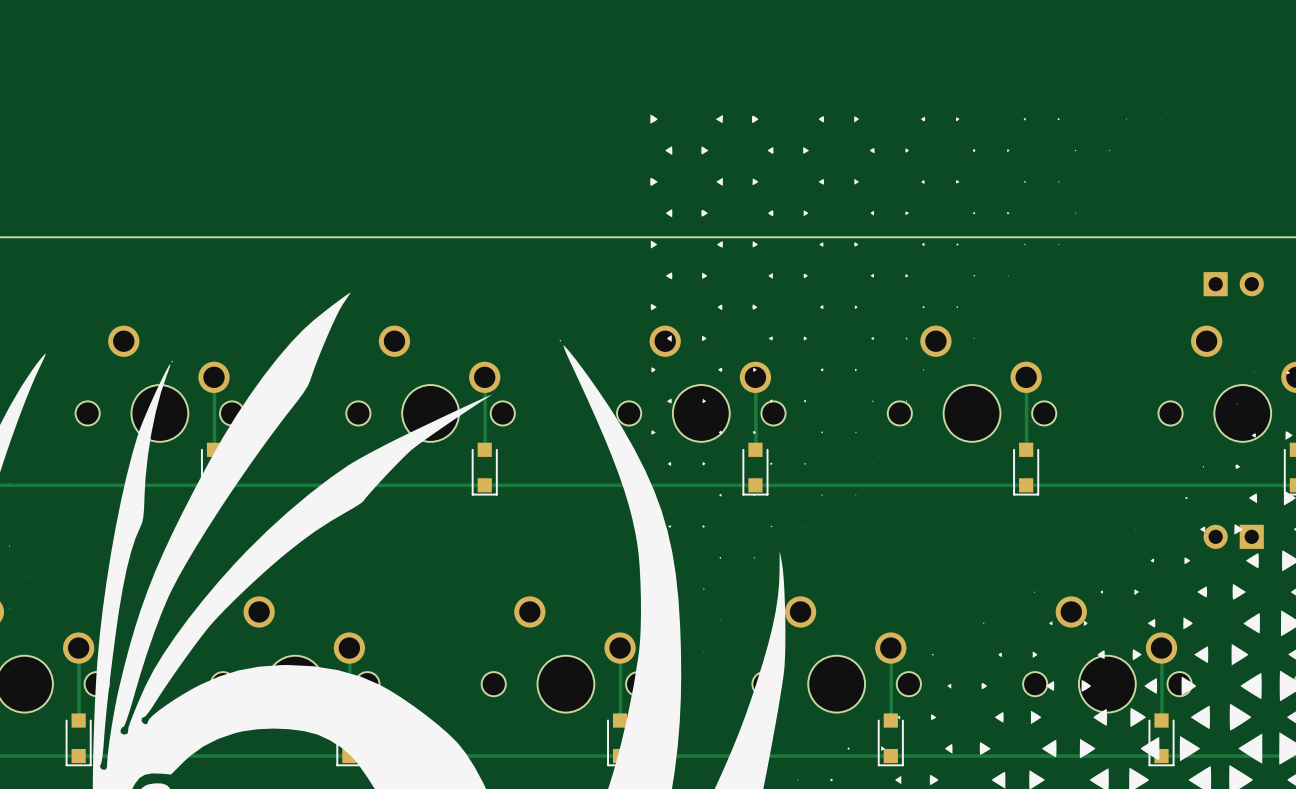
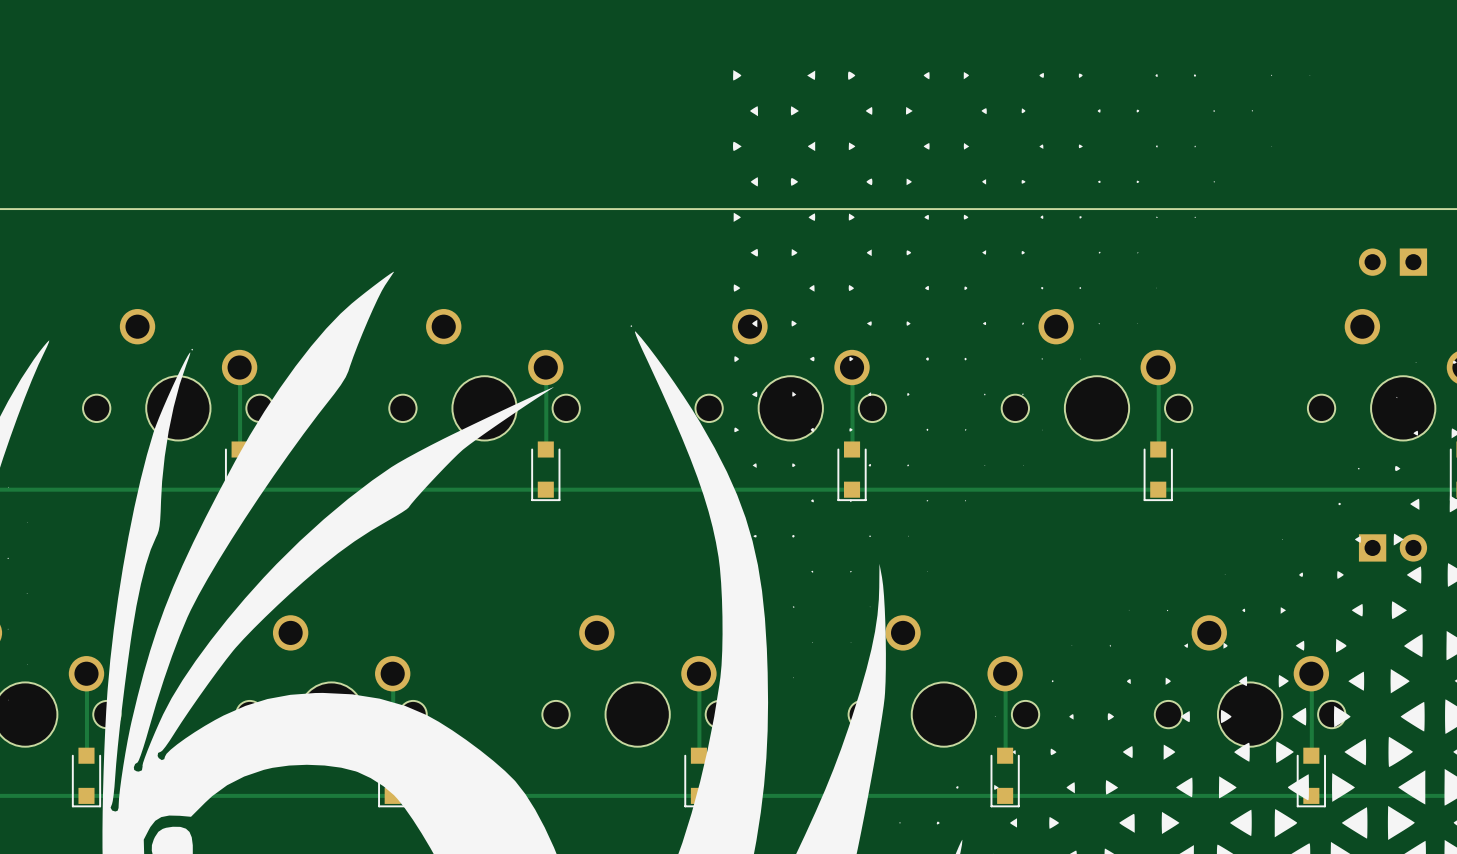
part rotation: 0° (1233, 284) -> 180° (1393, 262)
part rotation: 0° (1233, 536) -> 180° (1393, 547)

